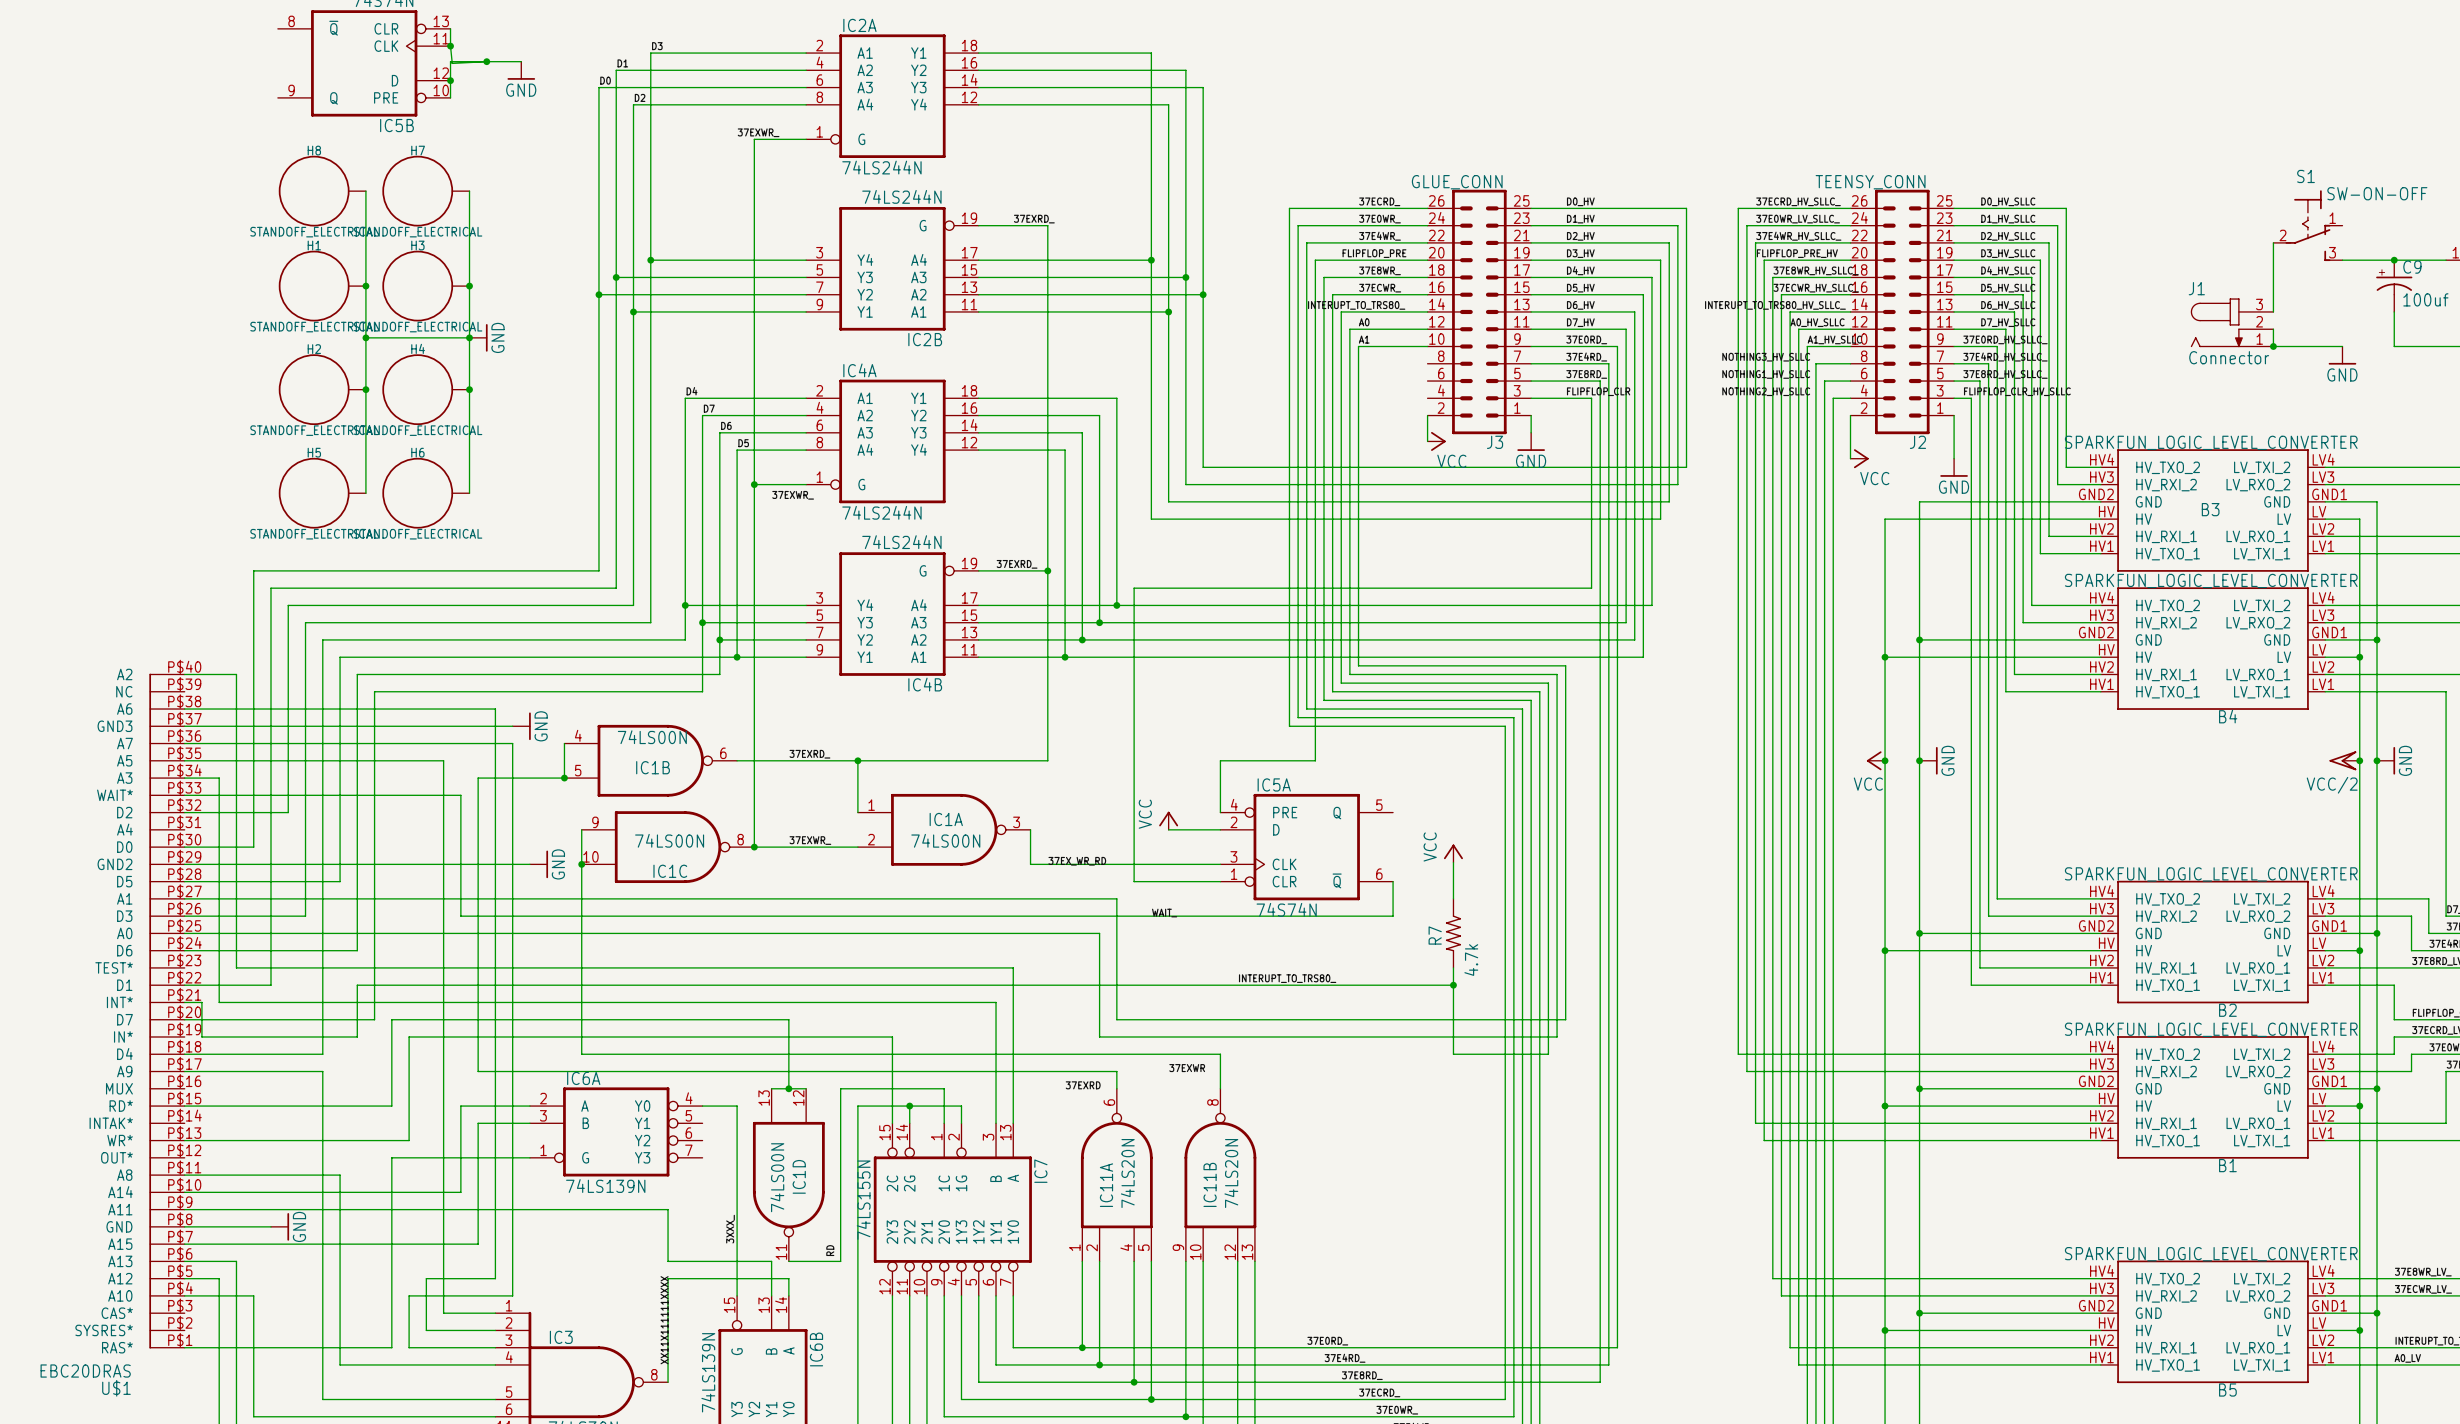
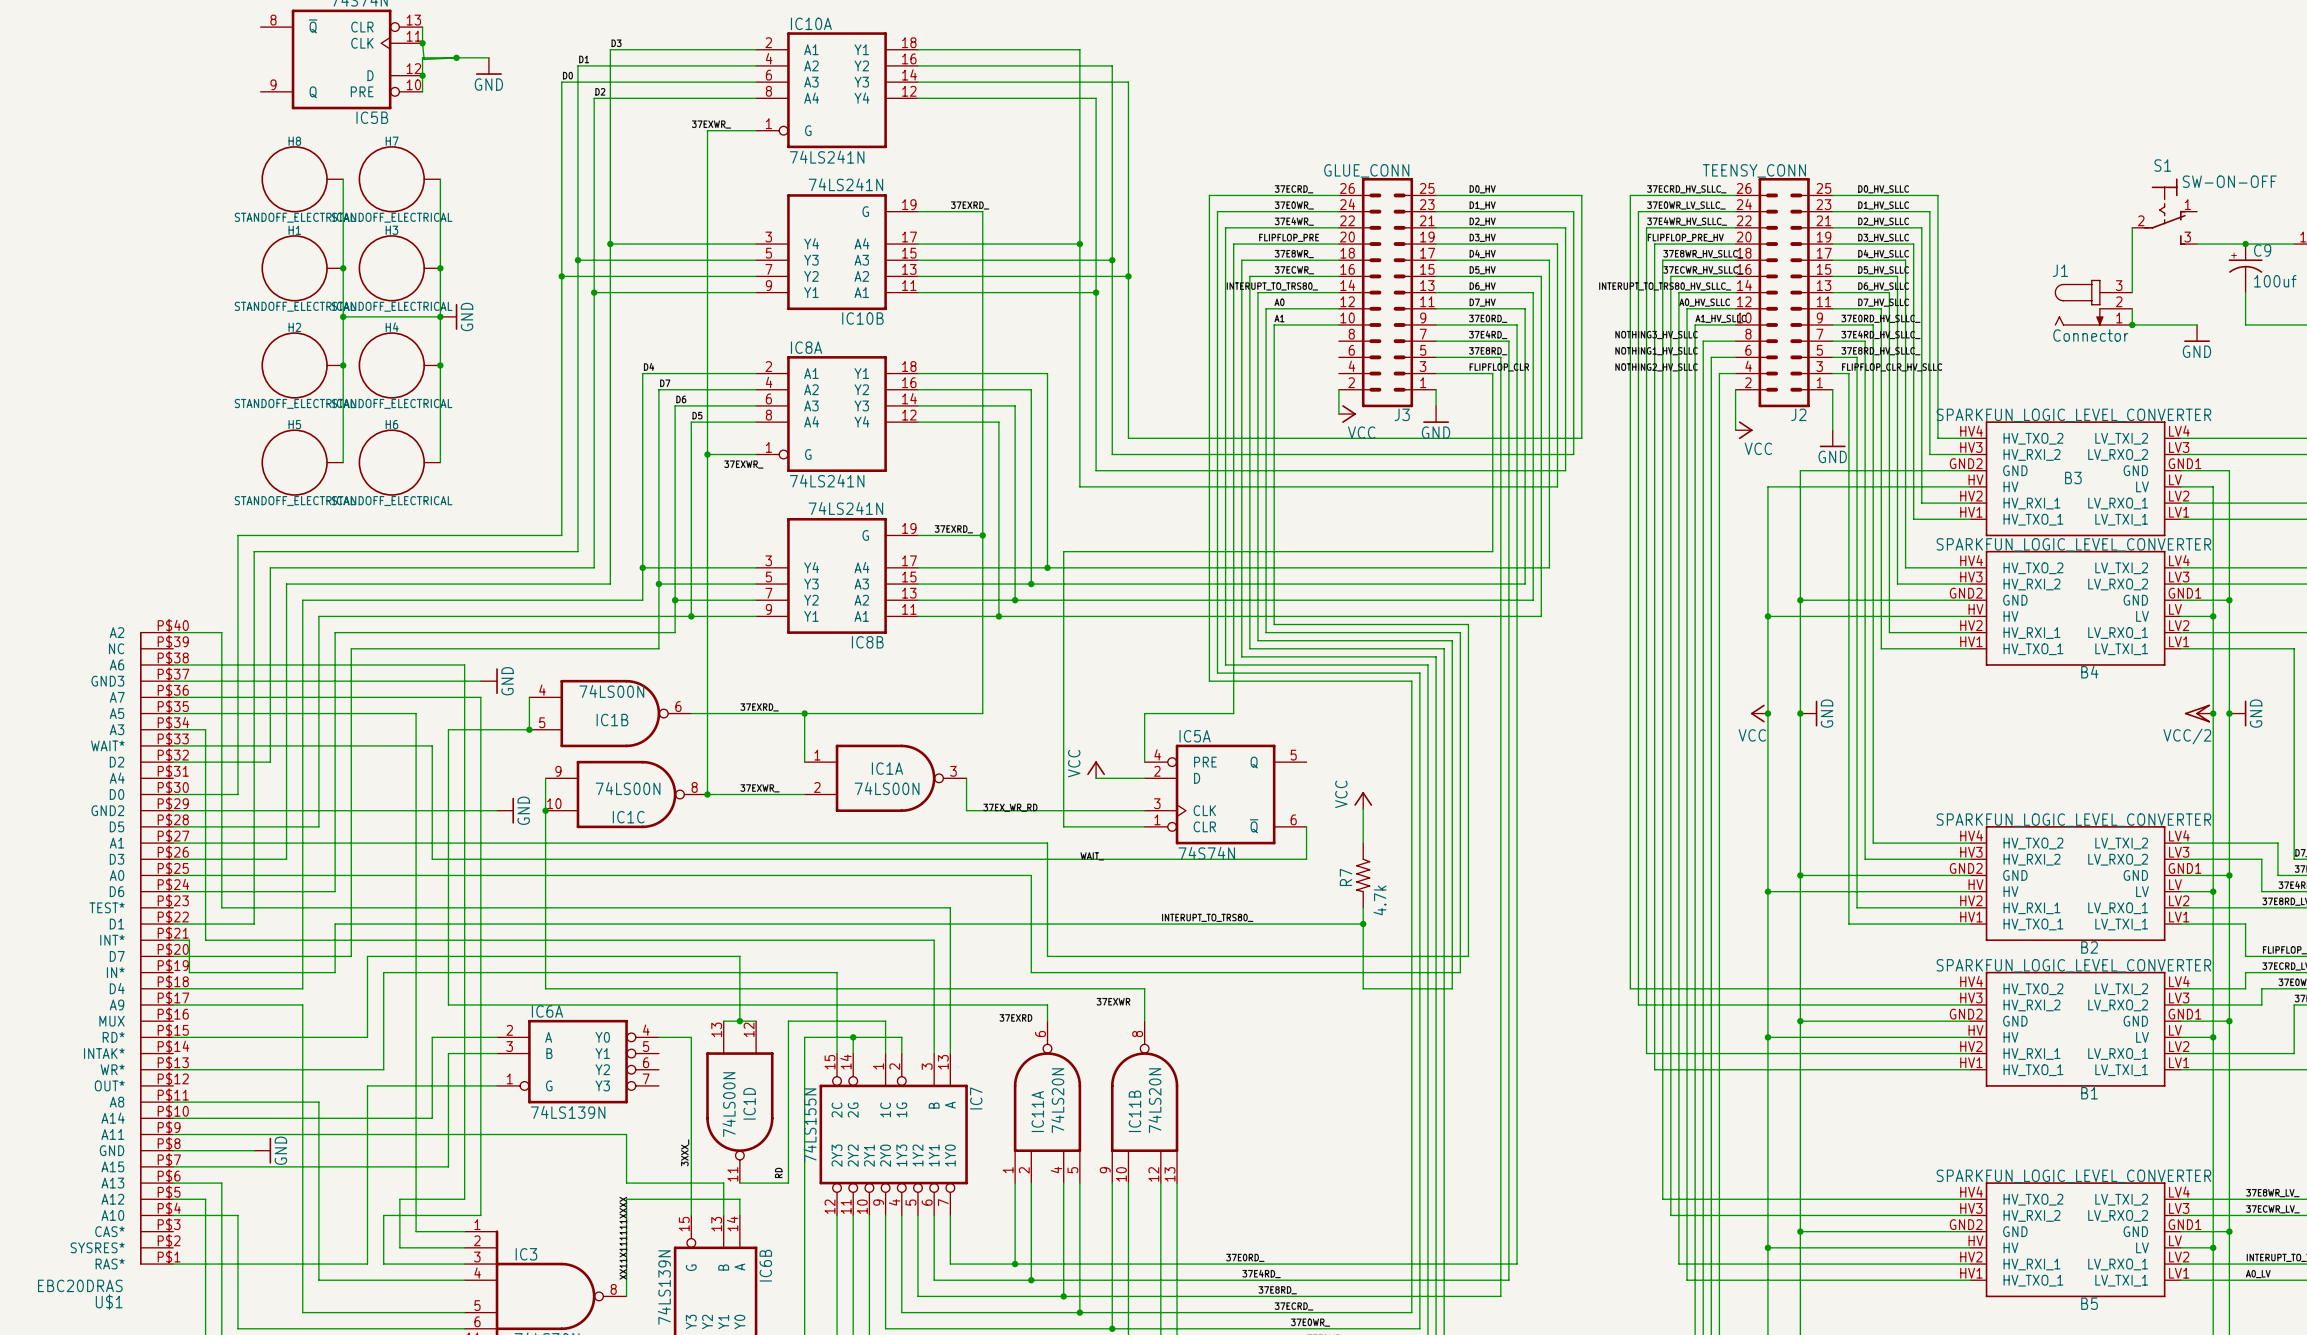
IC2A name: IC2A (859, 25) -> IC10A (811, 23)
IC2A value: 74LS244N (881, 167) -> 74LS241N (827, 157)
IC2B: 74LS244N (892, 268) -> none
IC10B: none -> 74LS241N (837, 252)
IC4A name: IC4A (859, 370) -> IC8A (806, 347)
IC4A value: 74LS244N (881, 512) -> 74LS241N (827, 480)
IC4B: 74LS244N (892, 614) -> none
IC8B: none -> 74LS241N (837, 575)

